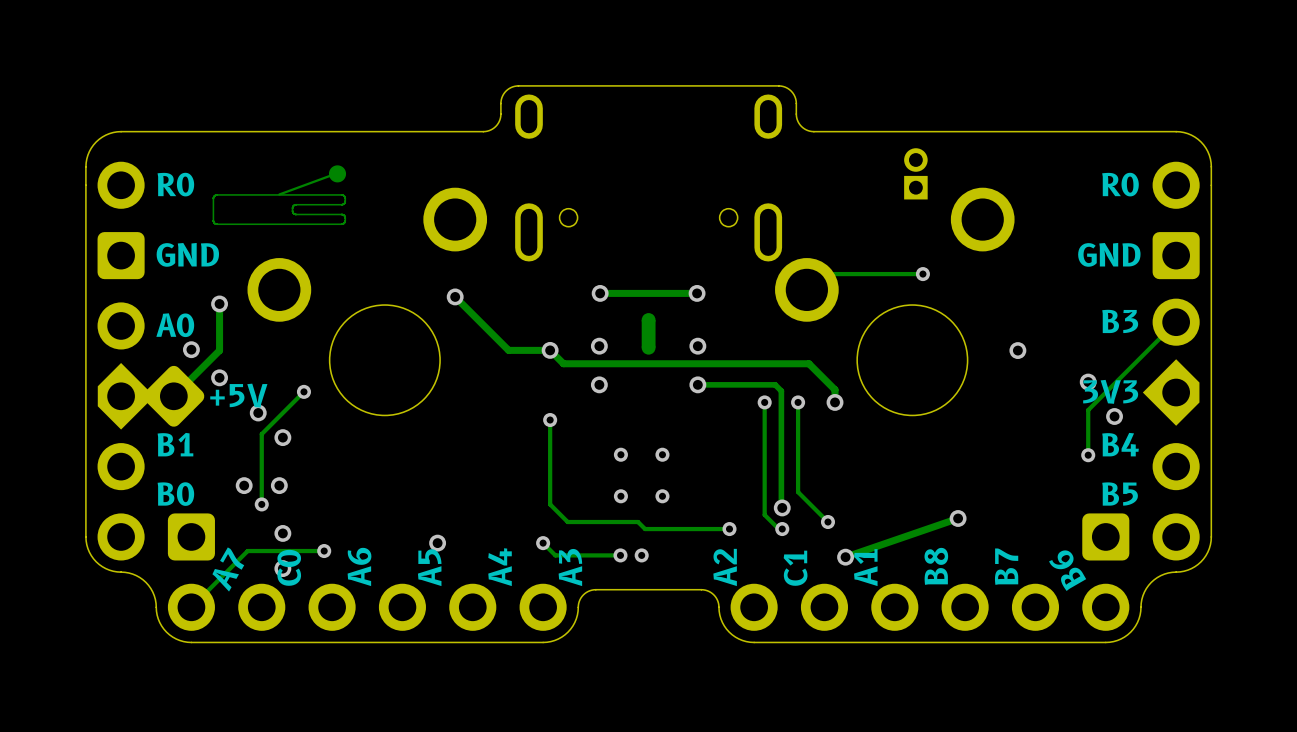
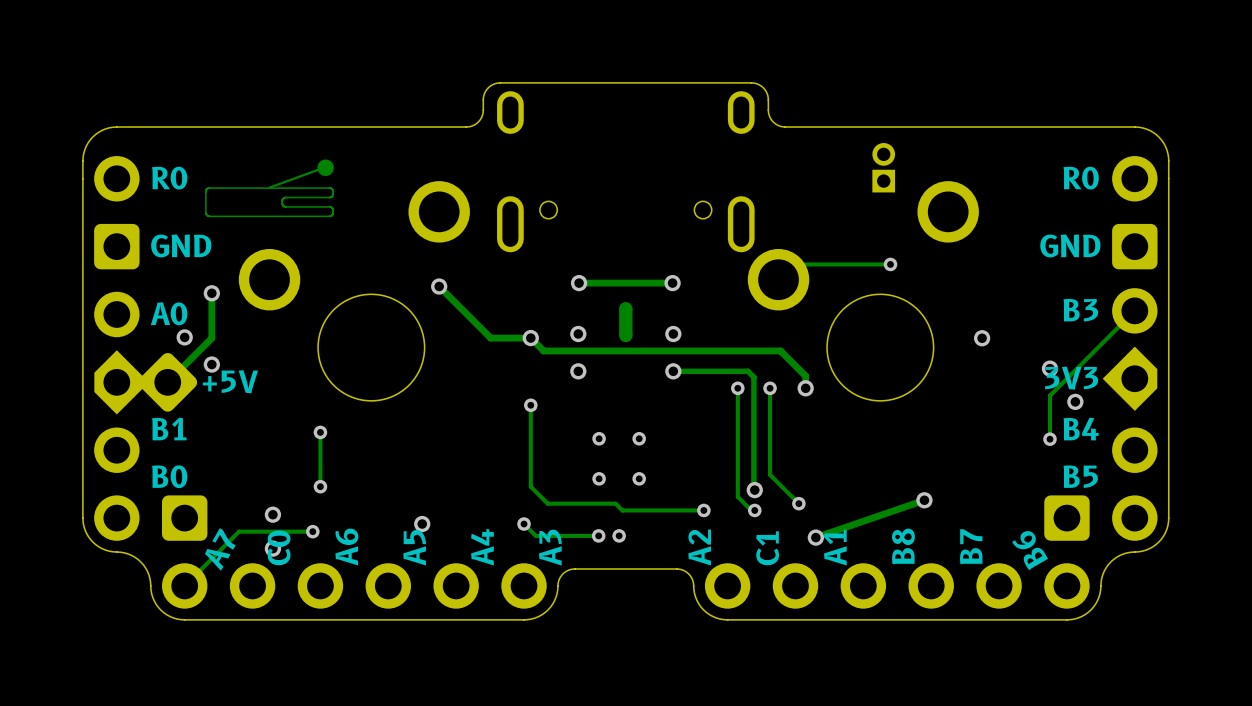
track: (303, 391) (261, 434) (261, 504) -> none
via: (303, 391) -> none
via: (258, 412) -> none
via: (282, 437) -> none
track: none -> (320, 432) (320, 486)
via: none -> (320, 432)
via: (244, 485) -> none
via: (279, 485) -> none
via: (261, 504) -> none
via: none -> (320, 486)

